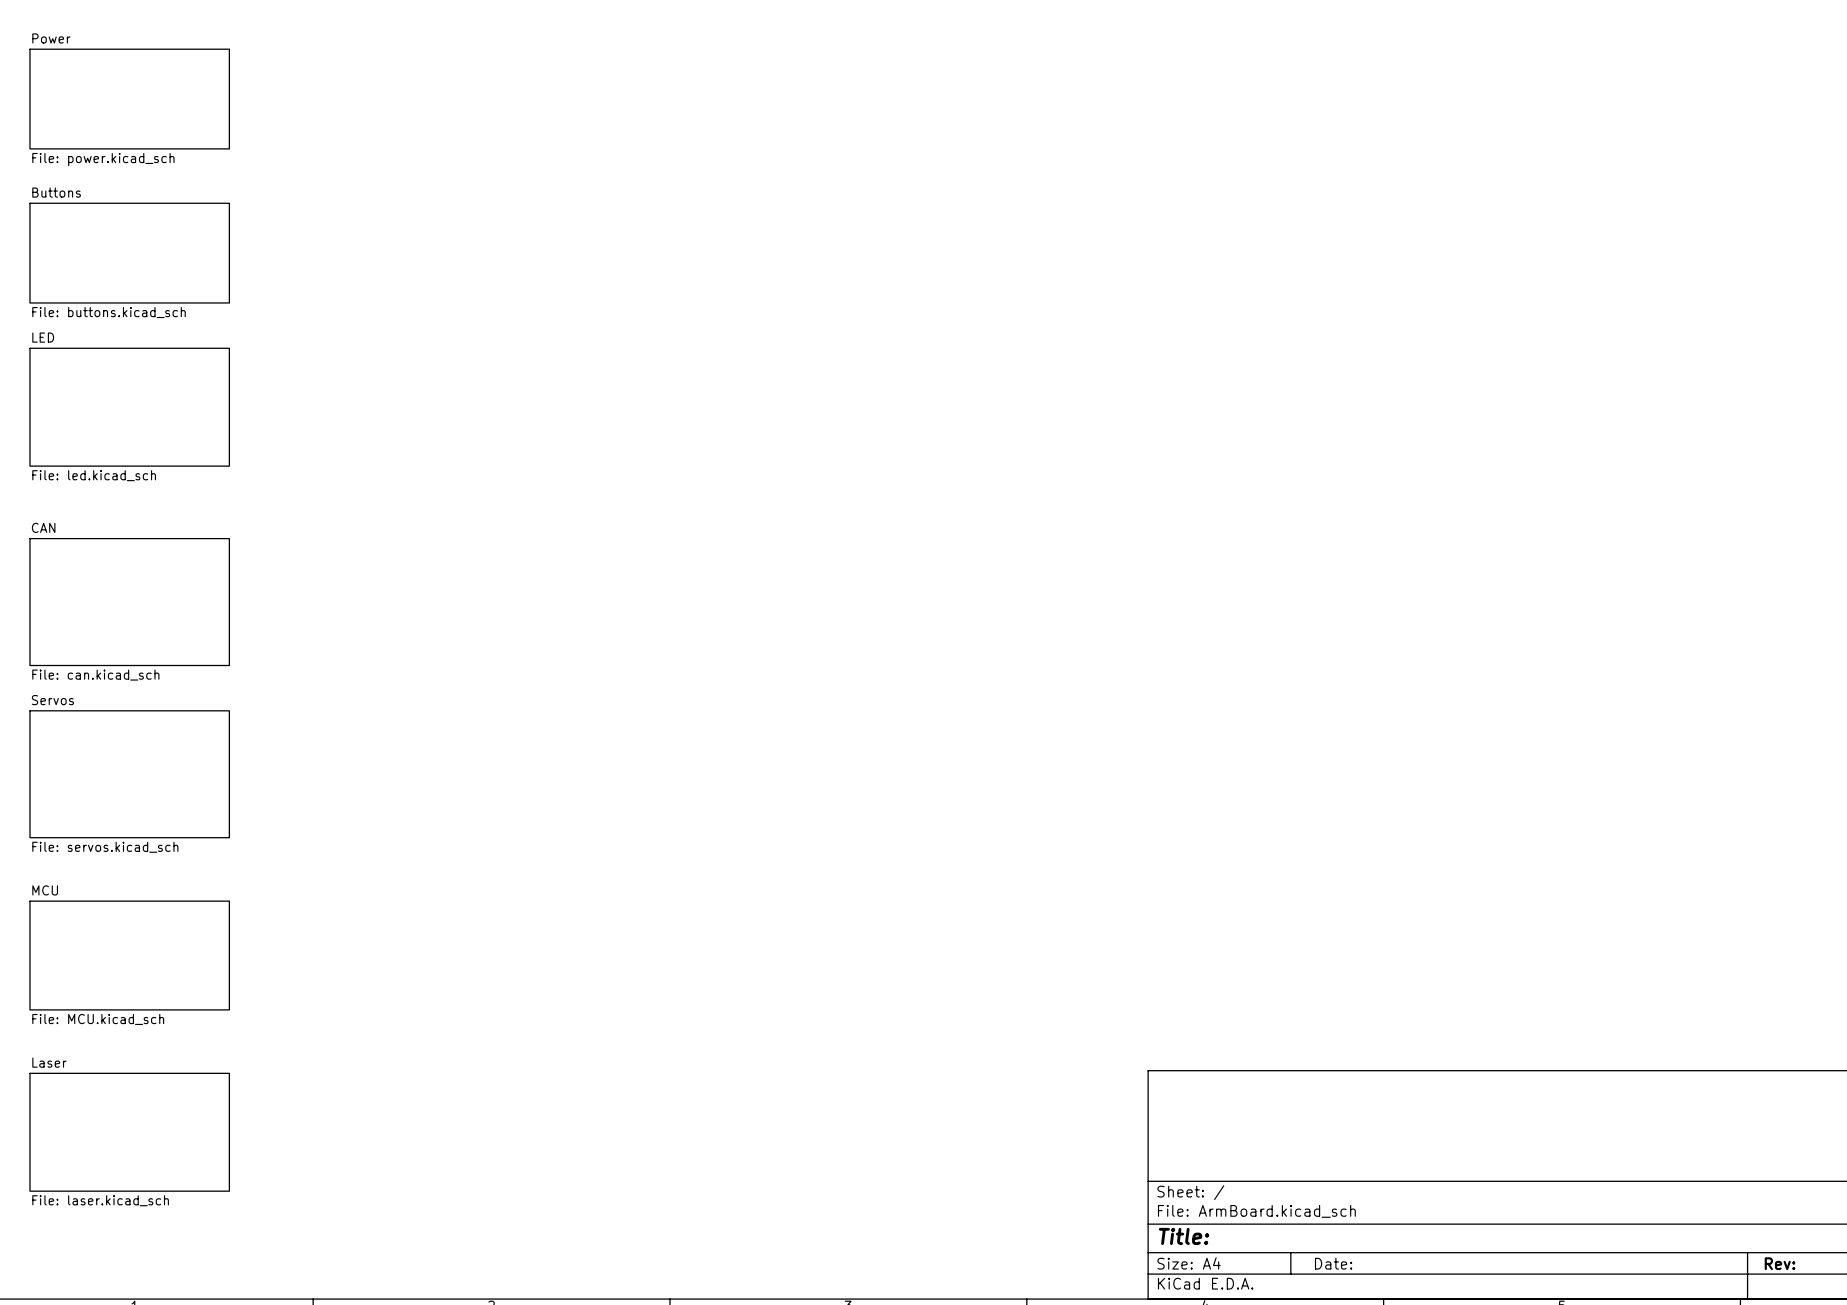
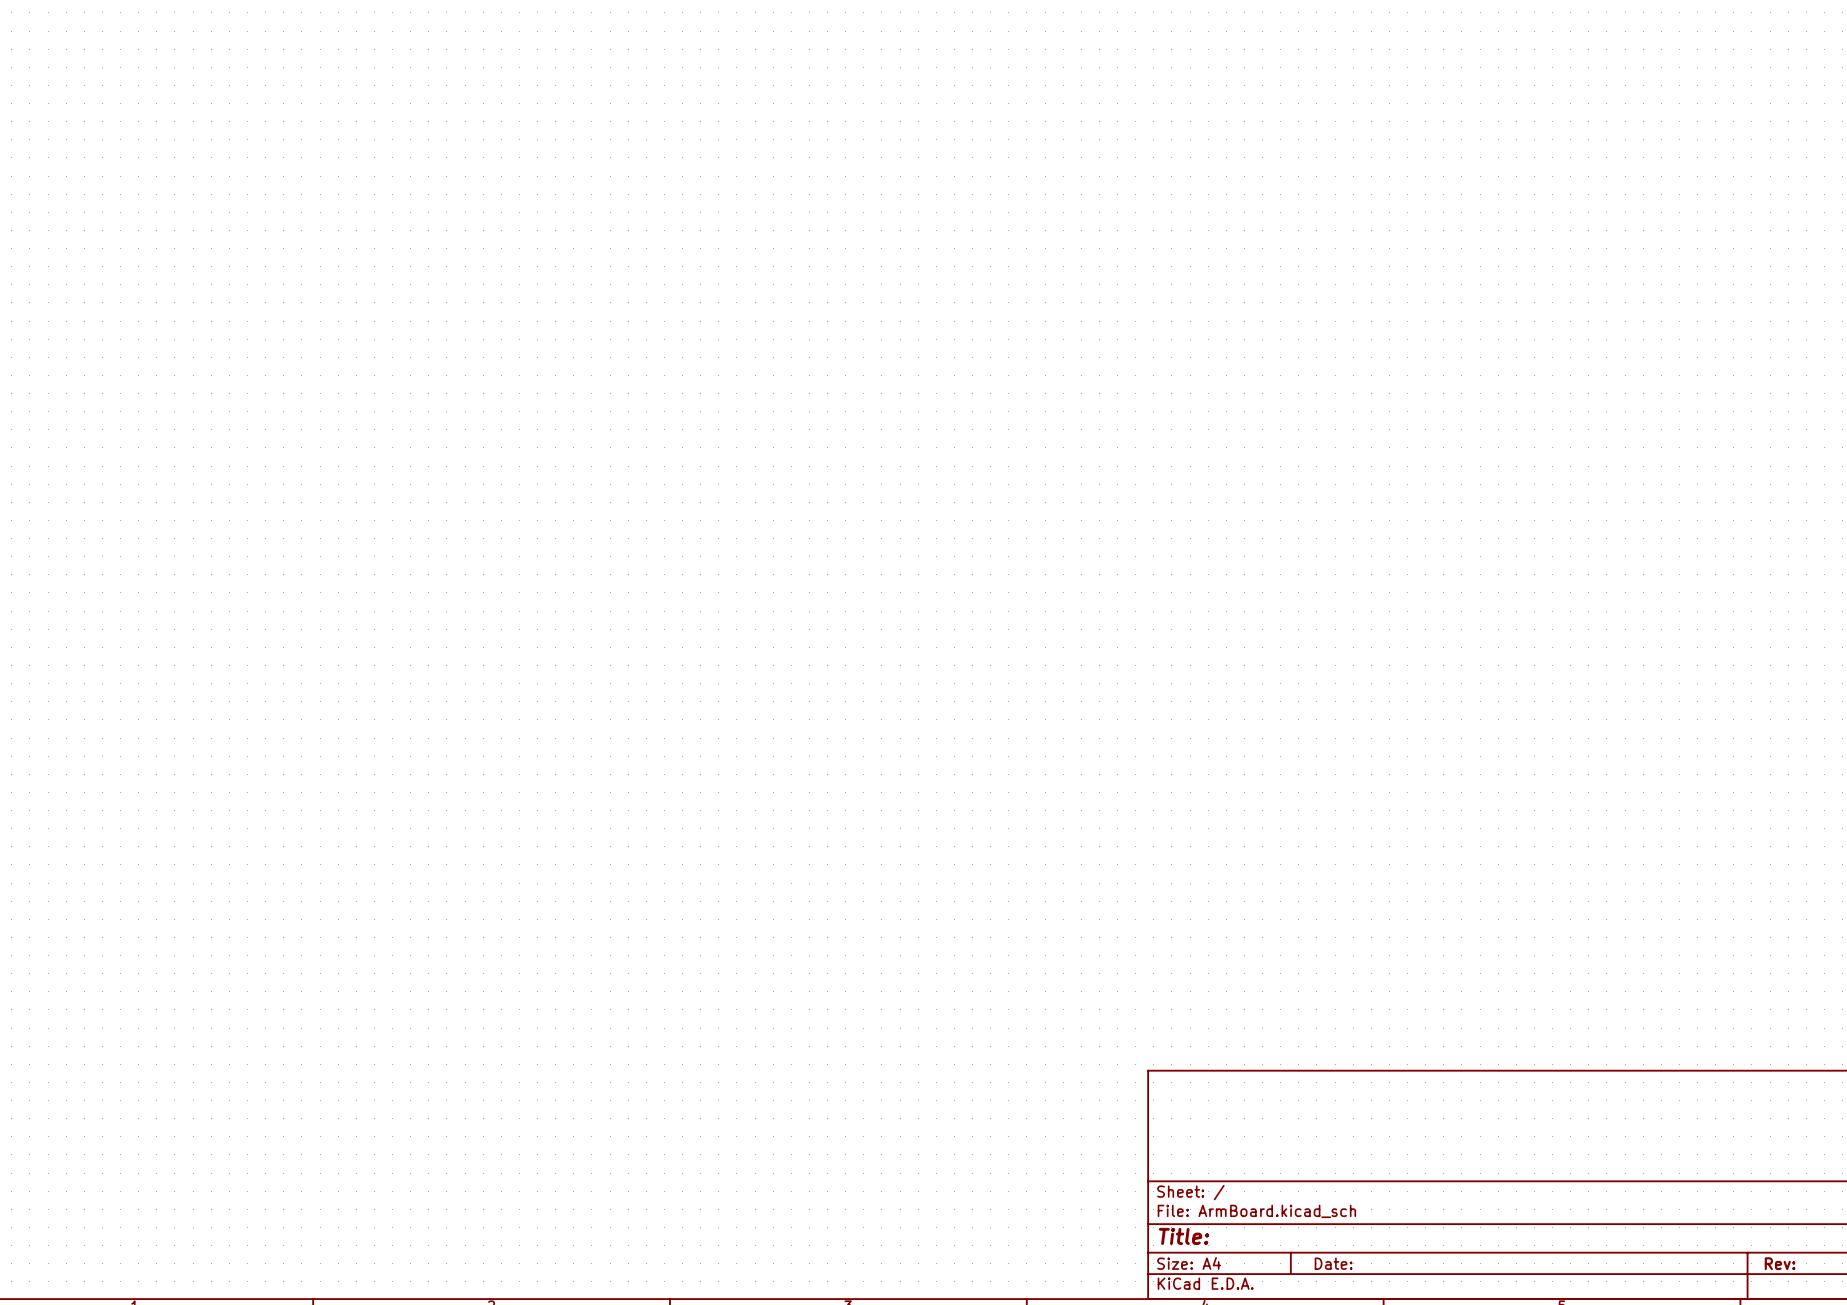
sheet Power: File: power.kicad_sch (129, 99) -> none
sheet Buttons: File: buttons.kicad_sch (129, 253) -> none
sheet LED: File: led.kicad_sch (129, 407) -> none
sheet CAN: File: can.kicad_sch (129, 602) -> none
sheet Servos: File: servos.kicad_sch (129, 774) -> none
sheet MCU: File: MCU.kicad_sch (129, 955) -> none
sheet Laser: File: laser.kicad_sch (129, 1132) -> none

